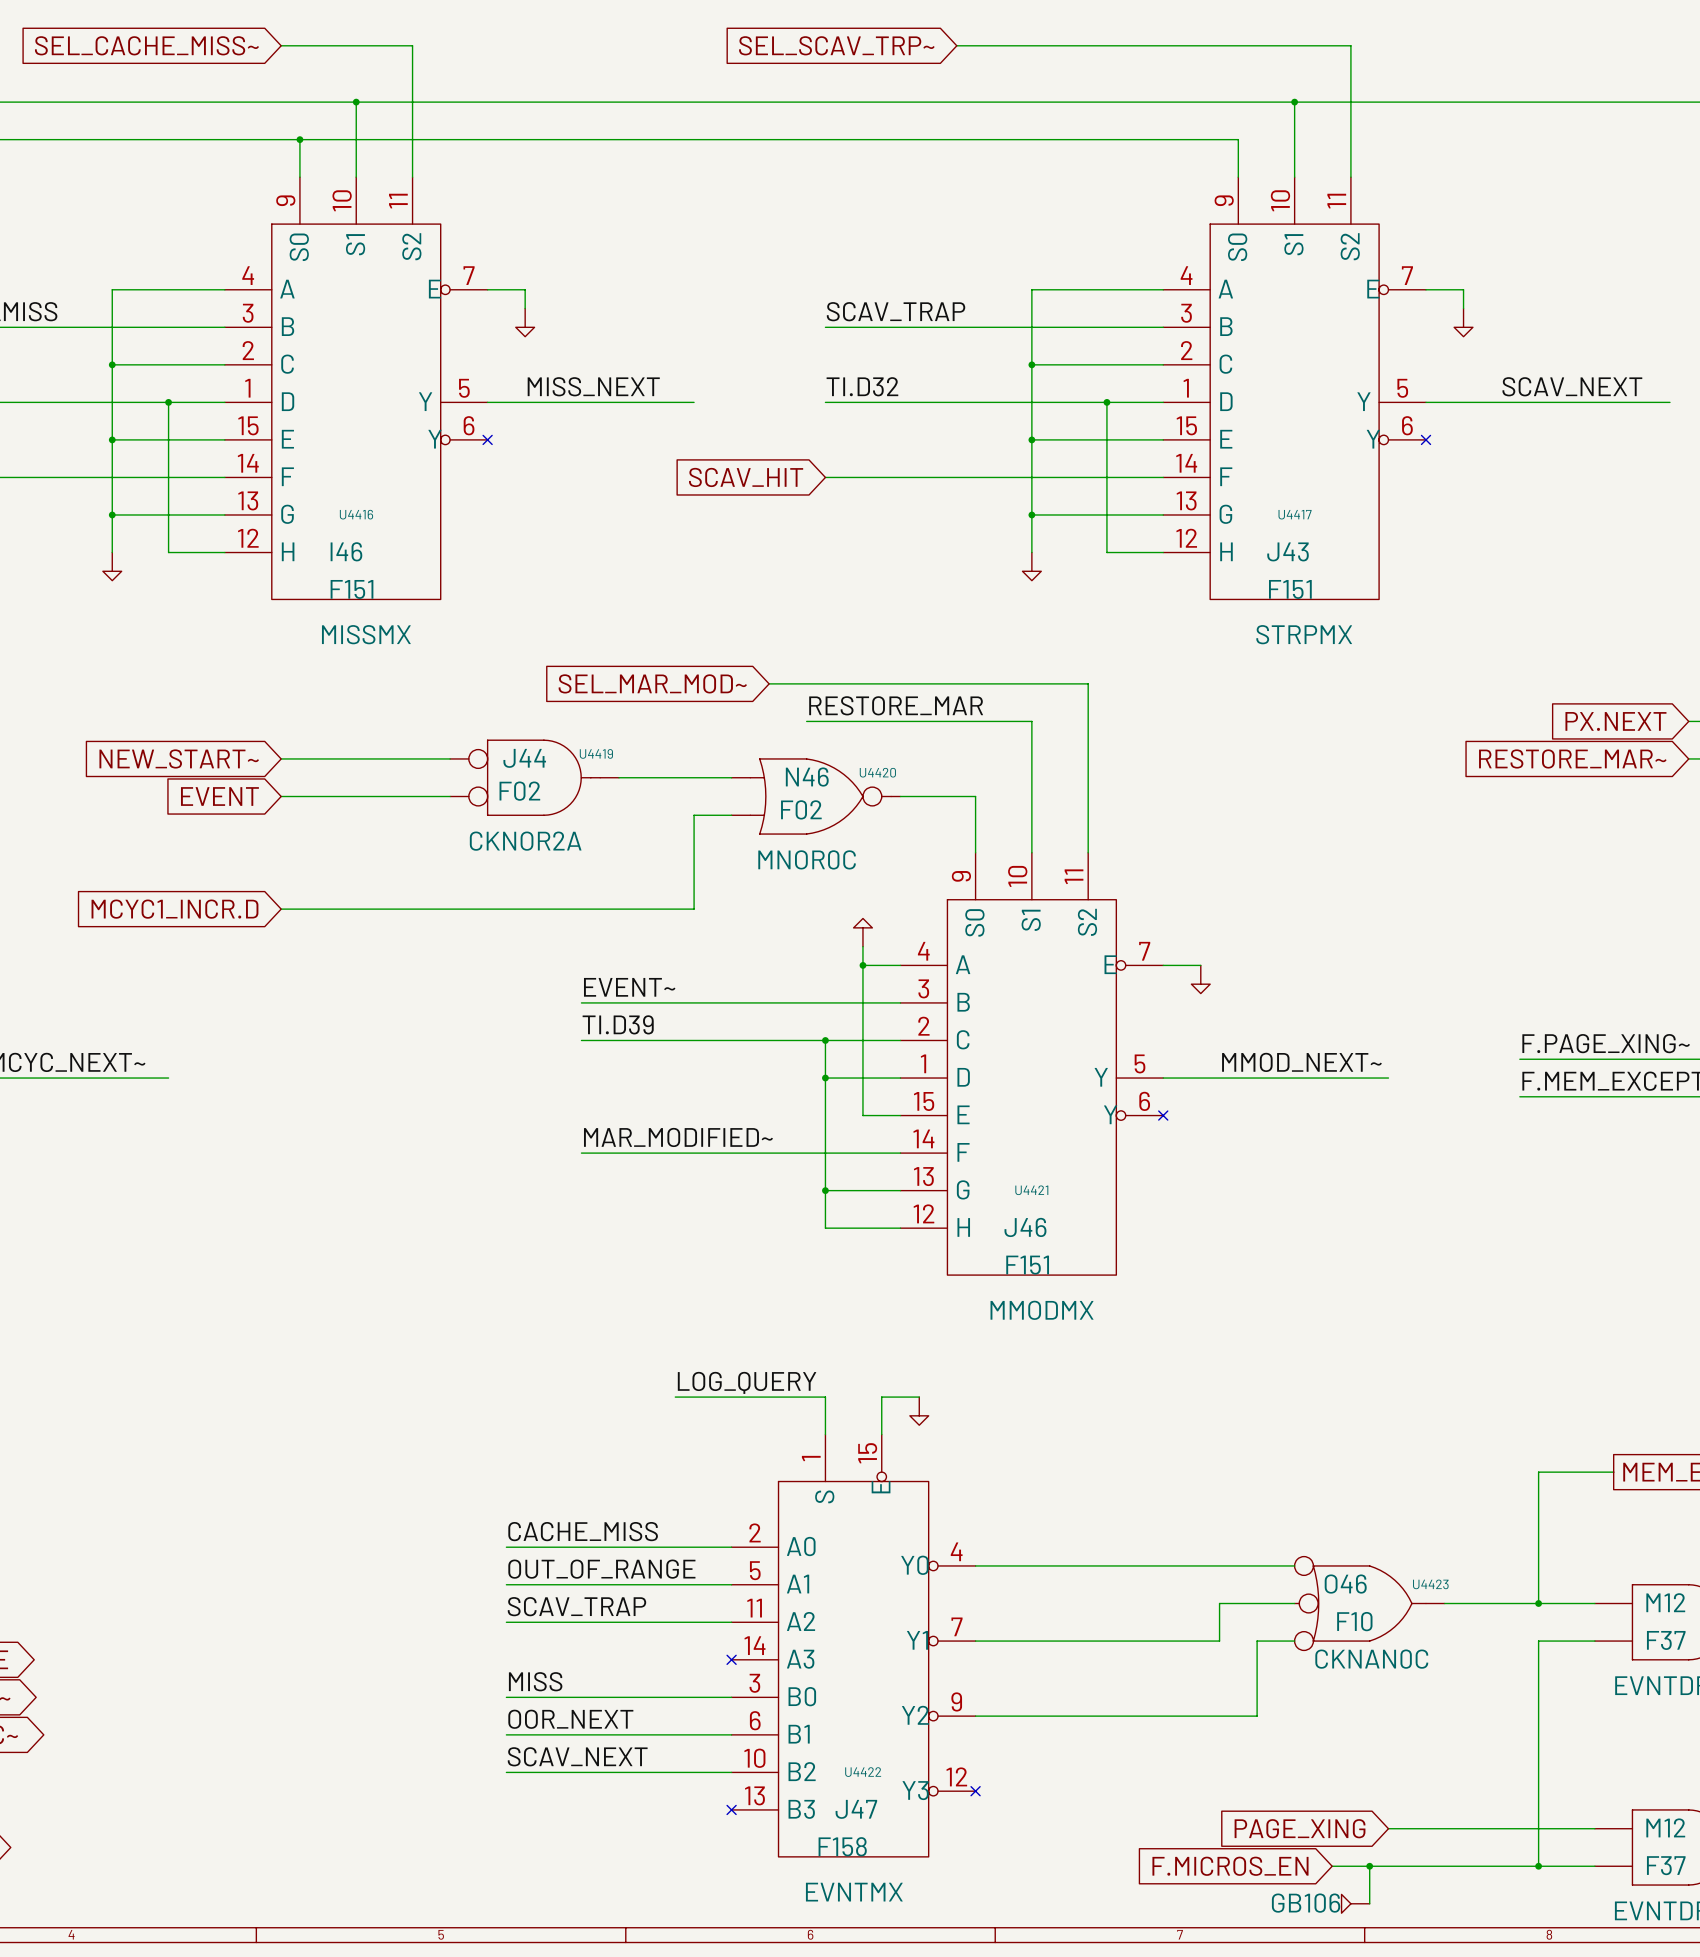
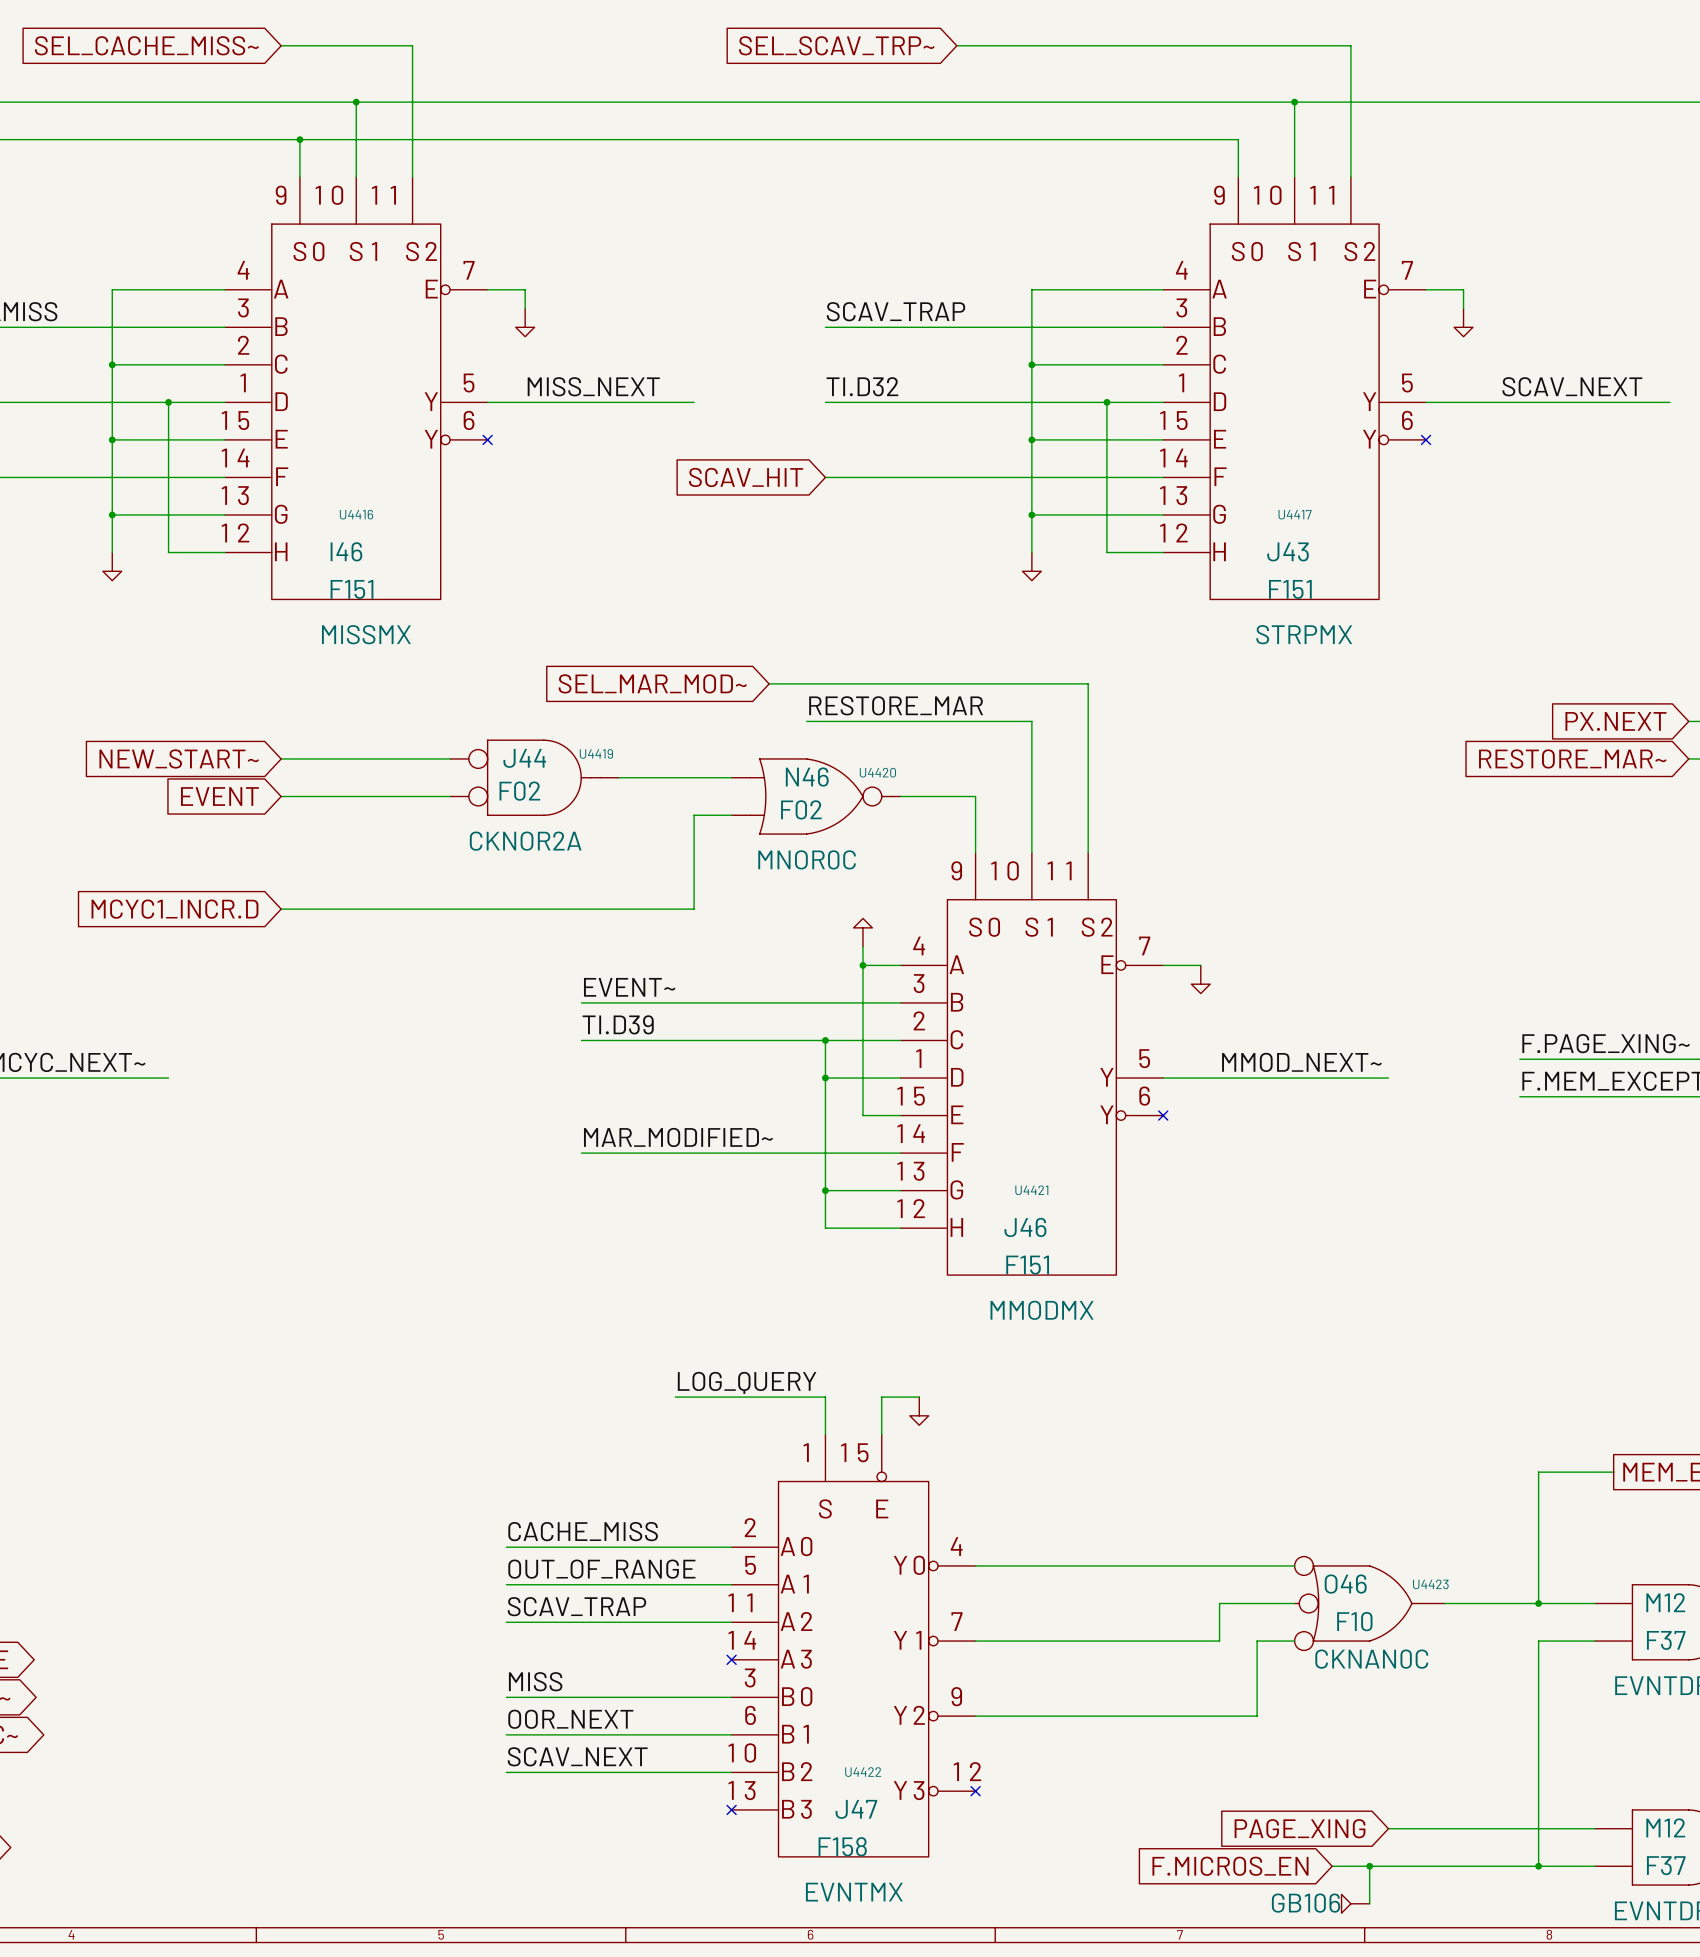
U4416 symbol: [224, 177, 488, 600] -> [224, 177, 488, 600]
U4417 symbol: [1163, 177, 1427, 600] -> [1163, 177, 1427, 600]
U4421 symbol: [900, 852, 1164, 1276] -> [900, 852, 1164, 1276]
U4422 symbol: [731, 1434, 976, 1857] -> [731, 1434, 976, 1857]

